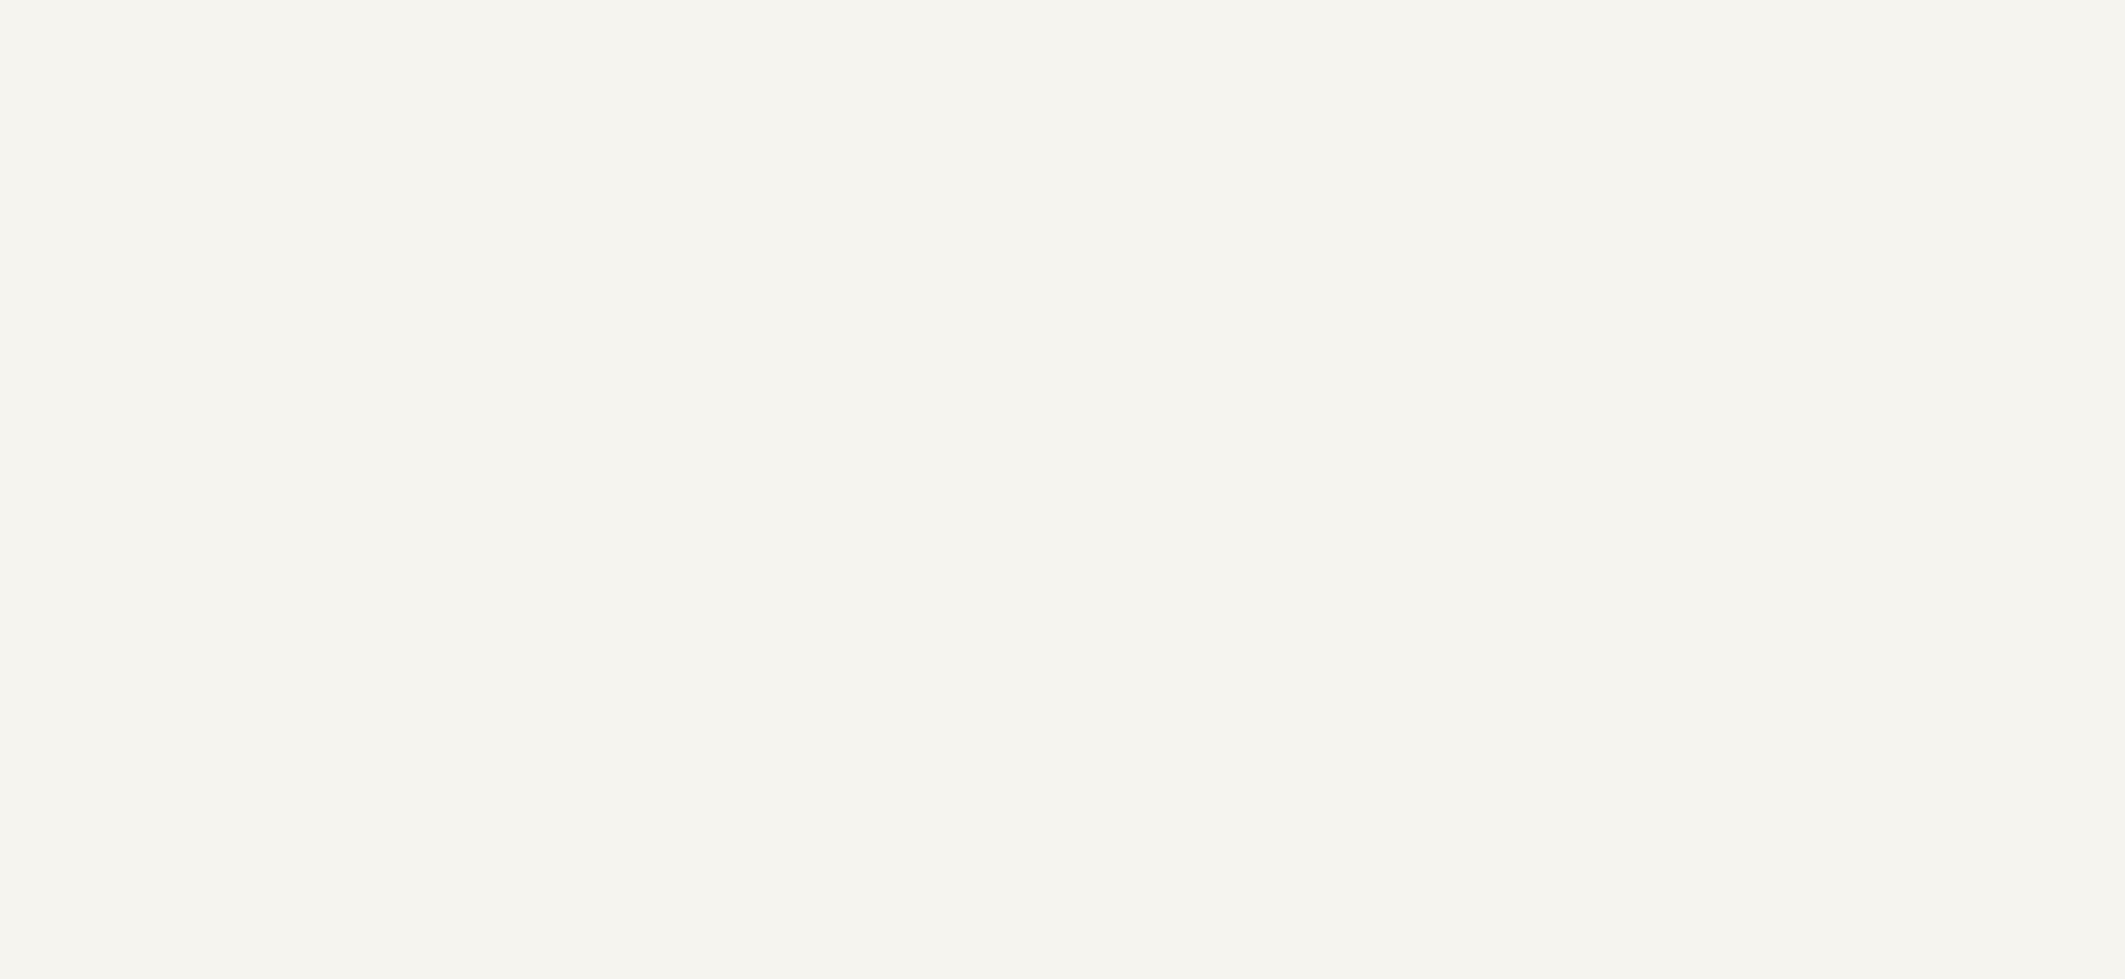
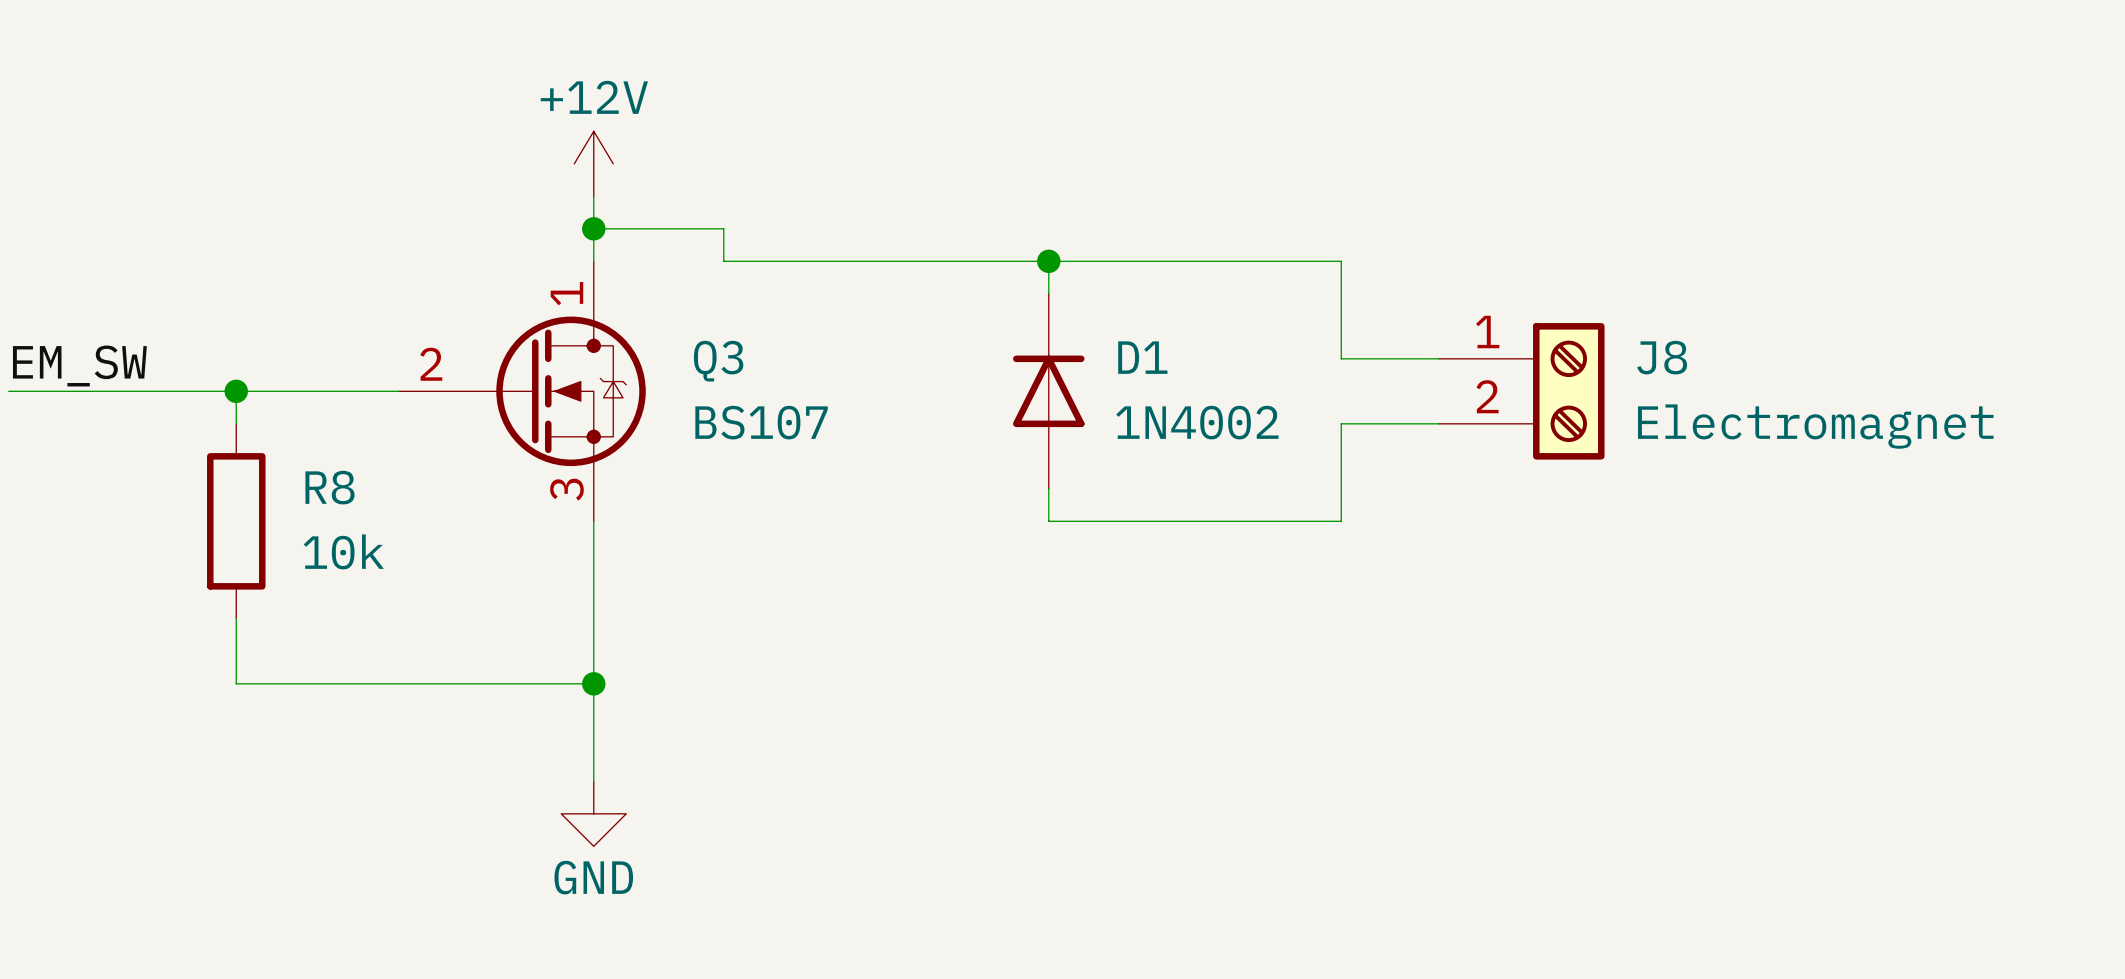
power symbol: none -> +12V (593, 163)
wire: none -> (593, 196) (593, 261)
wire: none -> (593, 228) (723, 228) (723, 261) (1341, 261) (1341, 358) (1438, 358)
junction: none -> (593, 228)
wire: none -> (1048, 261) (1048, 293)
junction: none -> (1048, 261)
label: none -> EM_SW (79, 365)
wire: none -> (8, 391) (398, 391)
wire: none -> (236, 391) (236, 423)
junction: none -> (236, 391)
Q3: none -> BS107 (522, 391)
D1: none -> 1N4002 (1048, 391)
J8: none -> Electromagnet (1521, 391)
wire: none -> (1438, 423) (1341, 423) (1341, 521) (1048, 521) (1048, 488)
R8: none -> 10k (236, 521)
wire: none -> (593, 521) (593, 781)
wire: none -> (236, 618) (236, 683) (593, 683)
junction: none -> (593, 683)
power symbol: none -> GND (593, 813)

